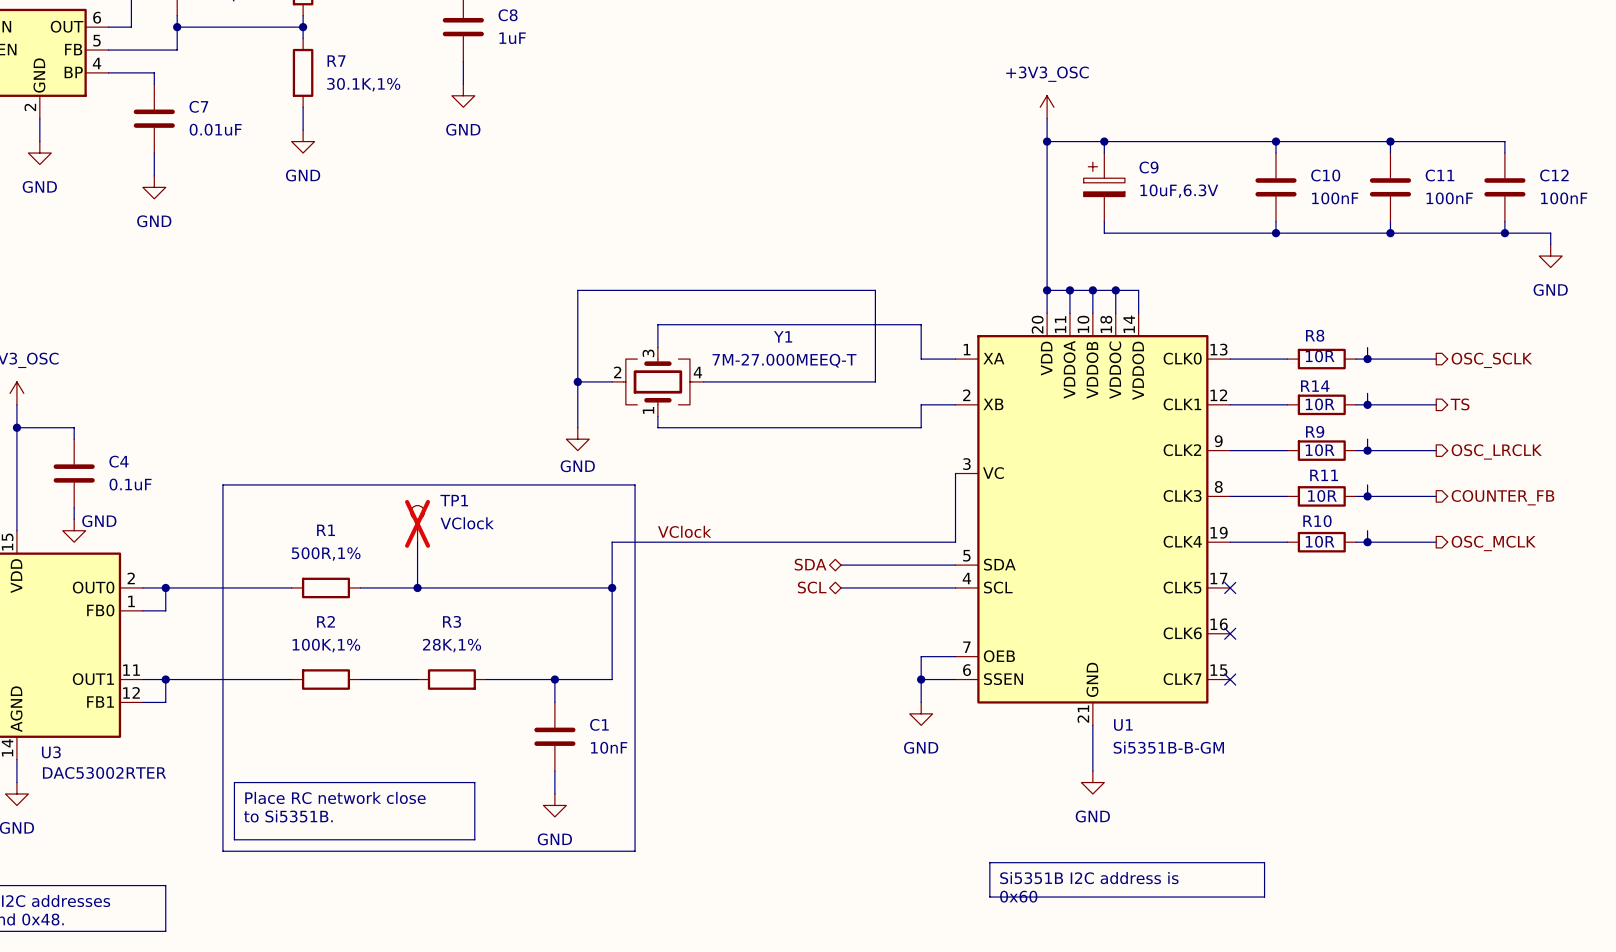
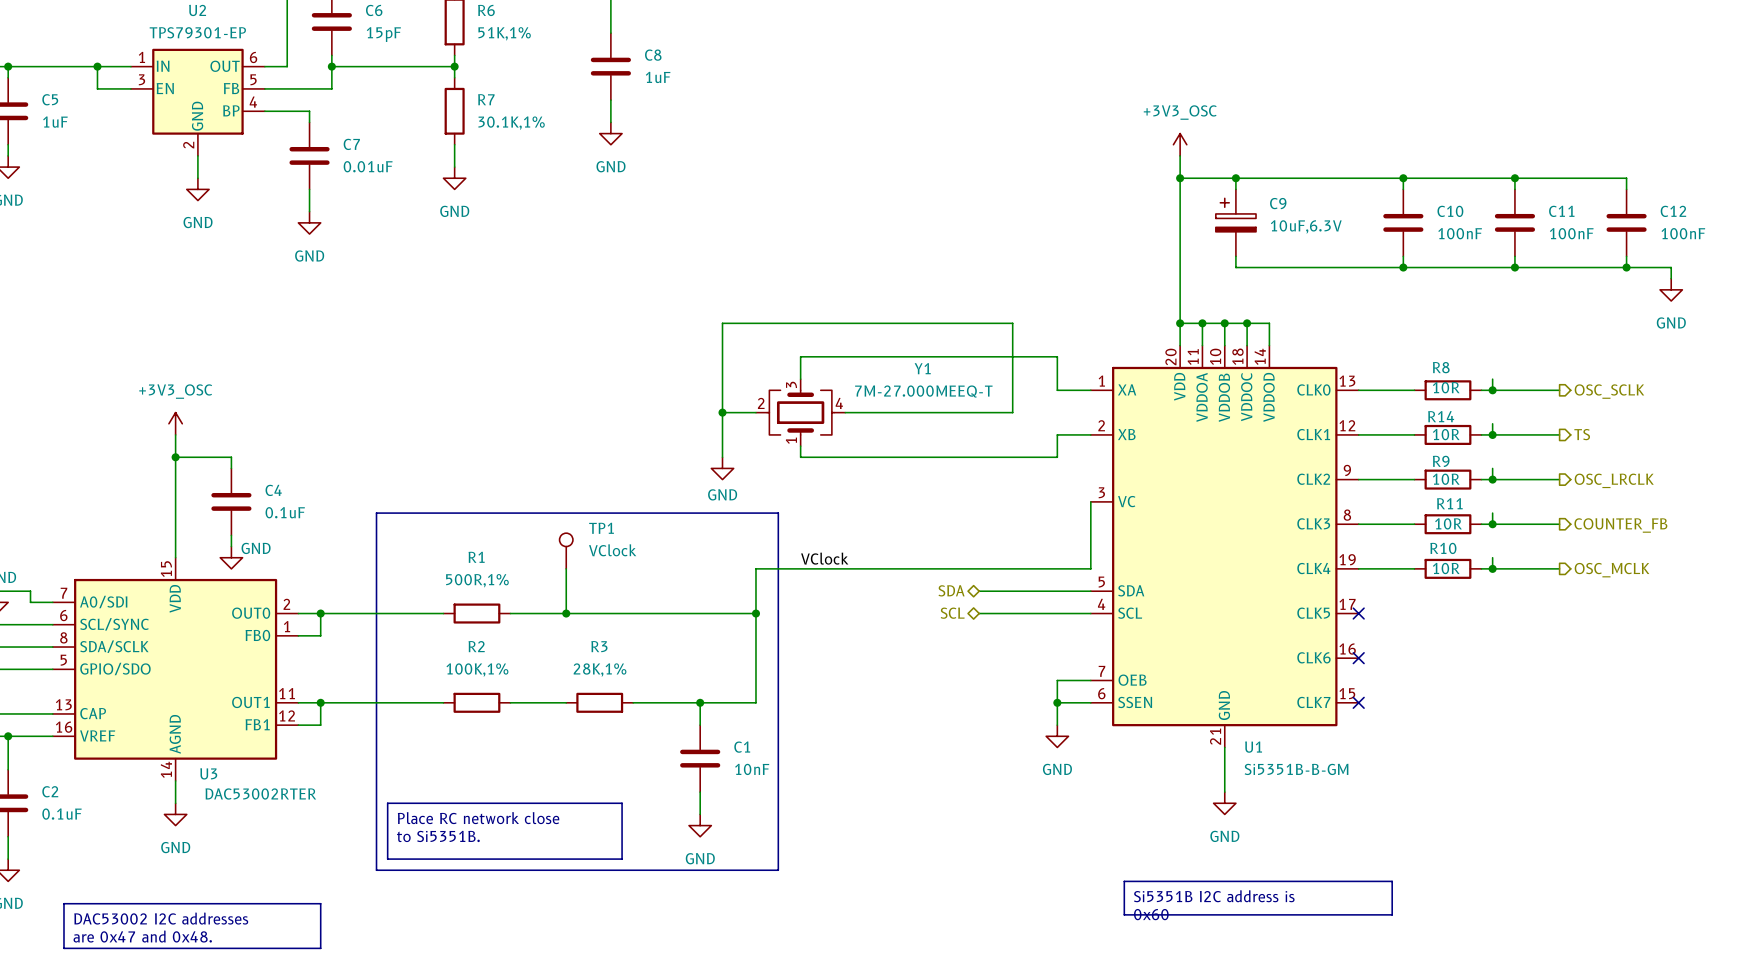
TP1 do-not-place cross: (417, 523) -> none

